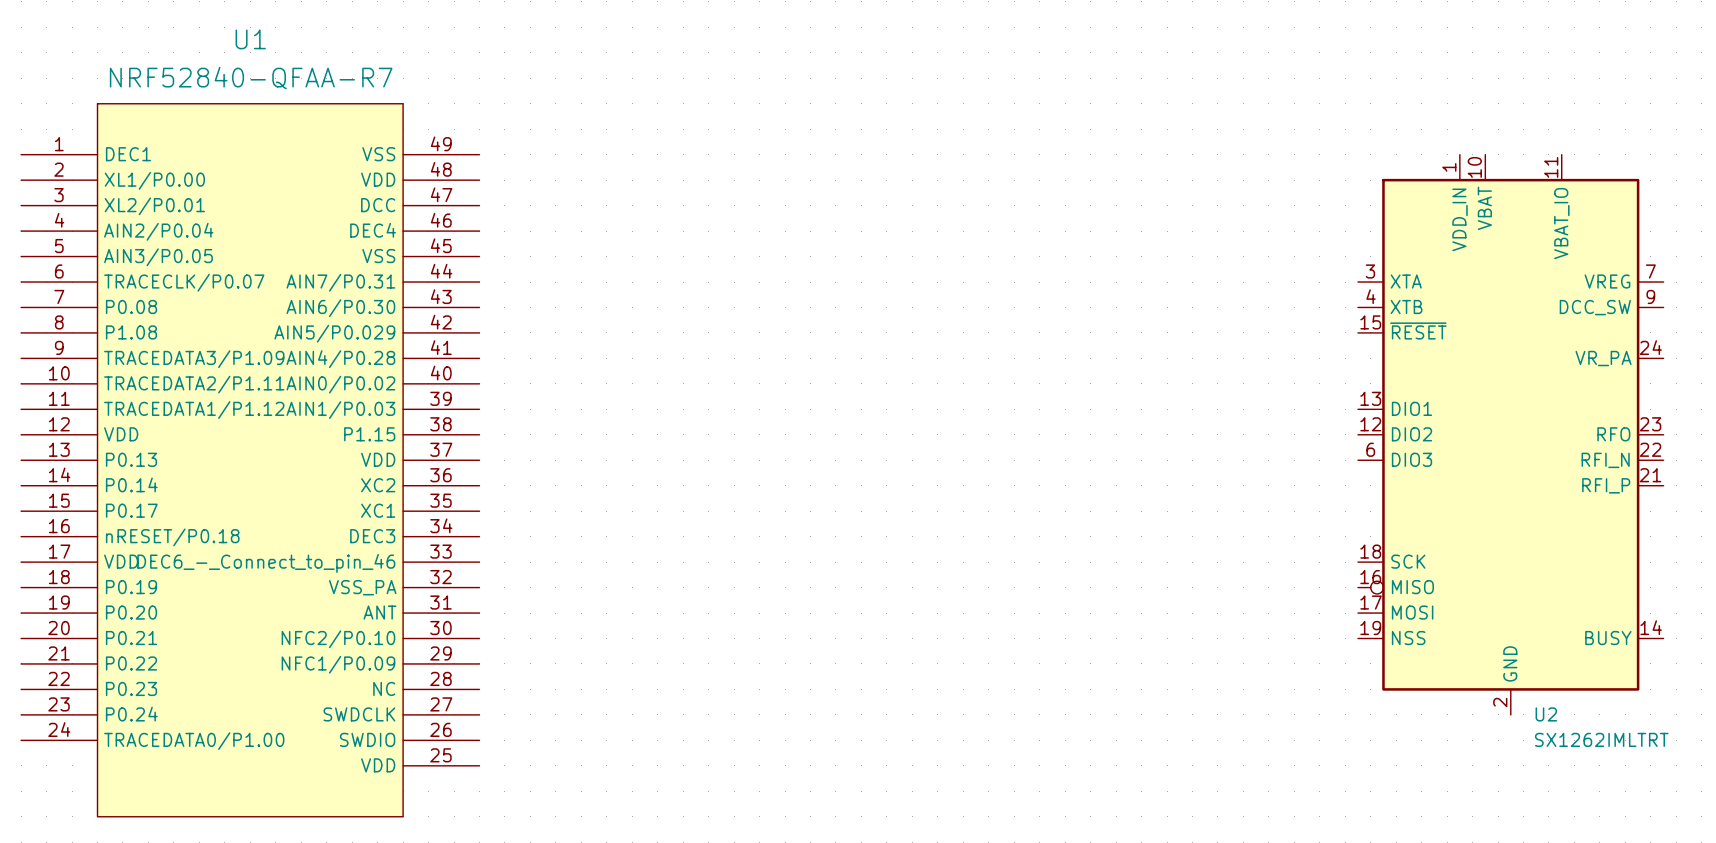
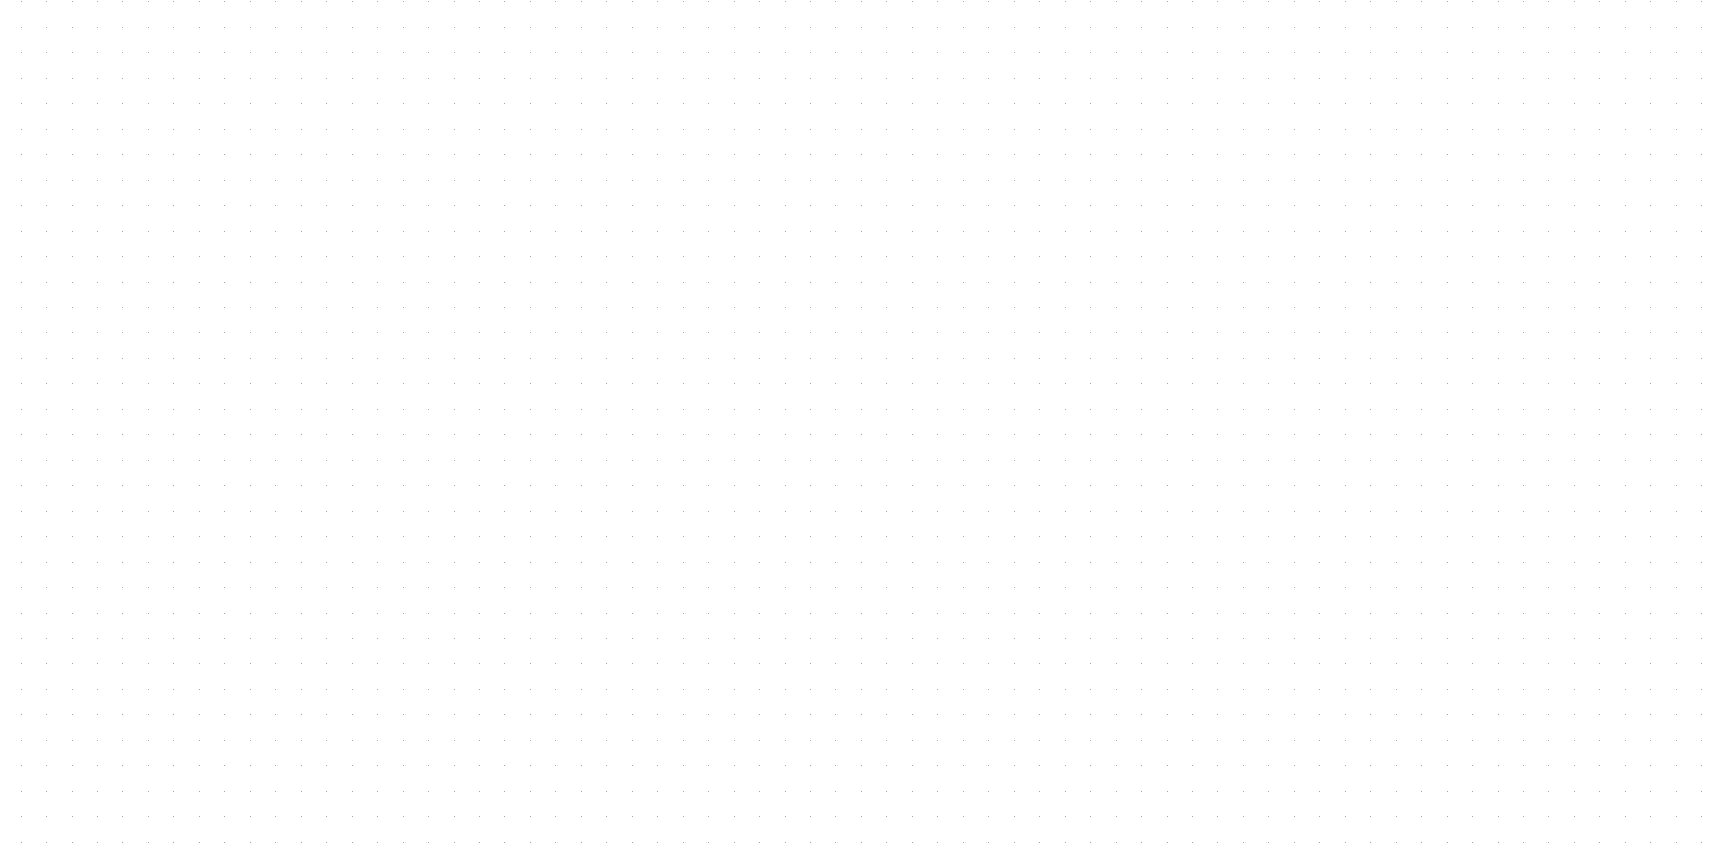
U2: SX1262IMLTRT (1510, 434) -> none
U1: NRF52840-QFAA-R7 (250, 460) -> none

